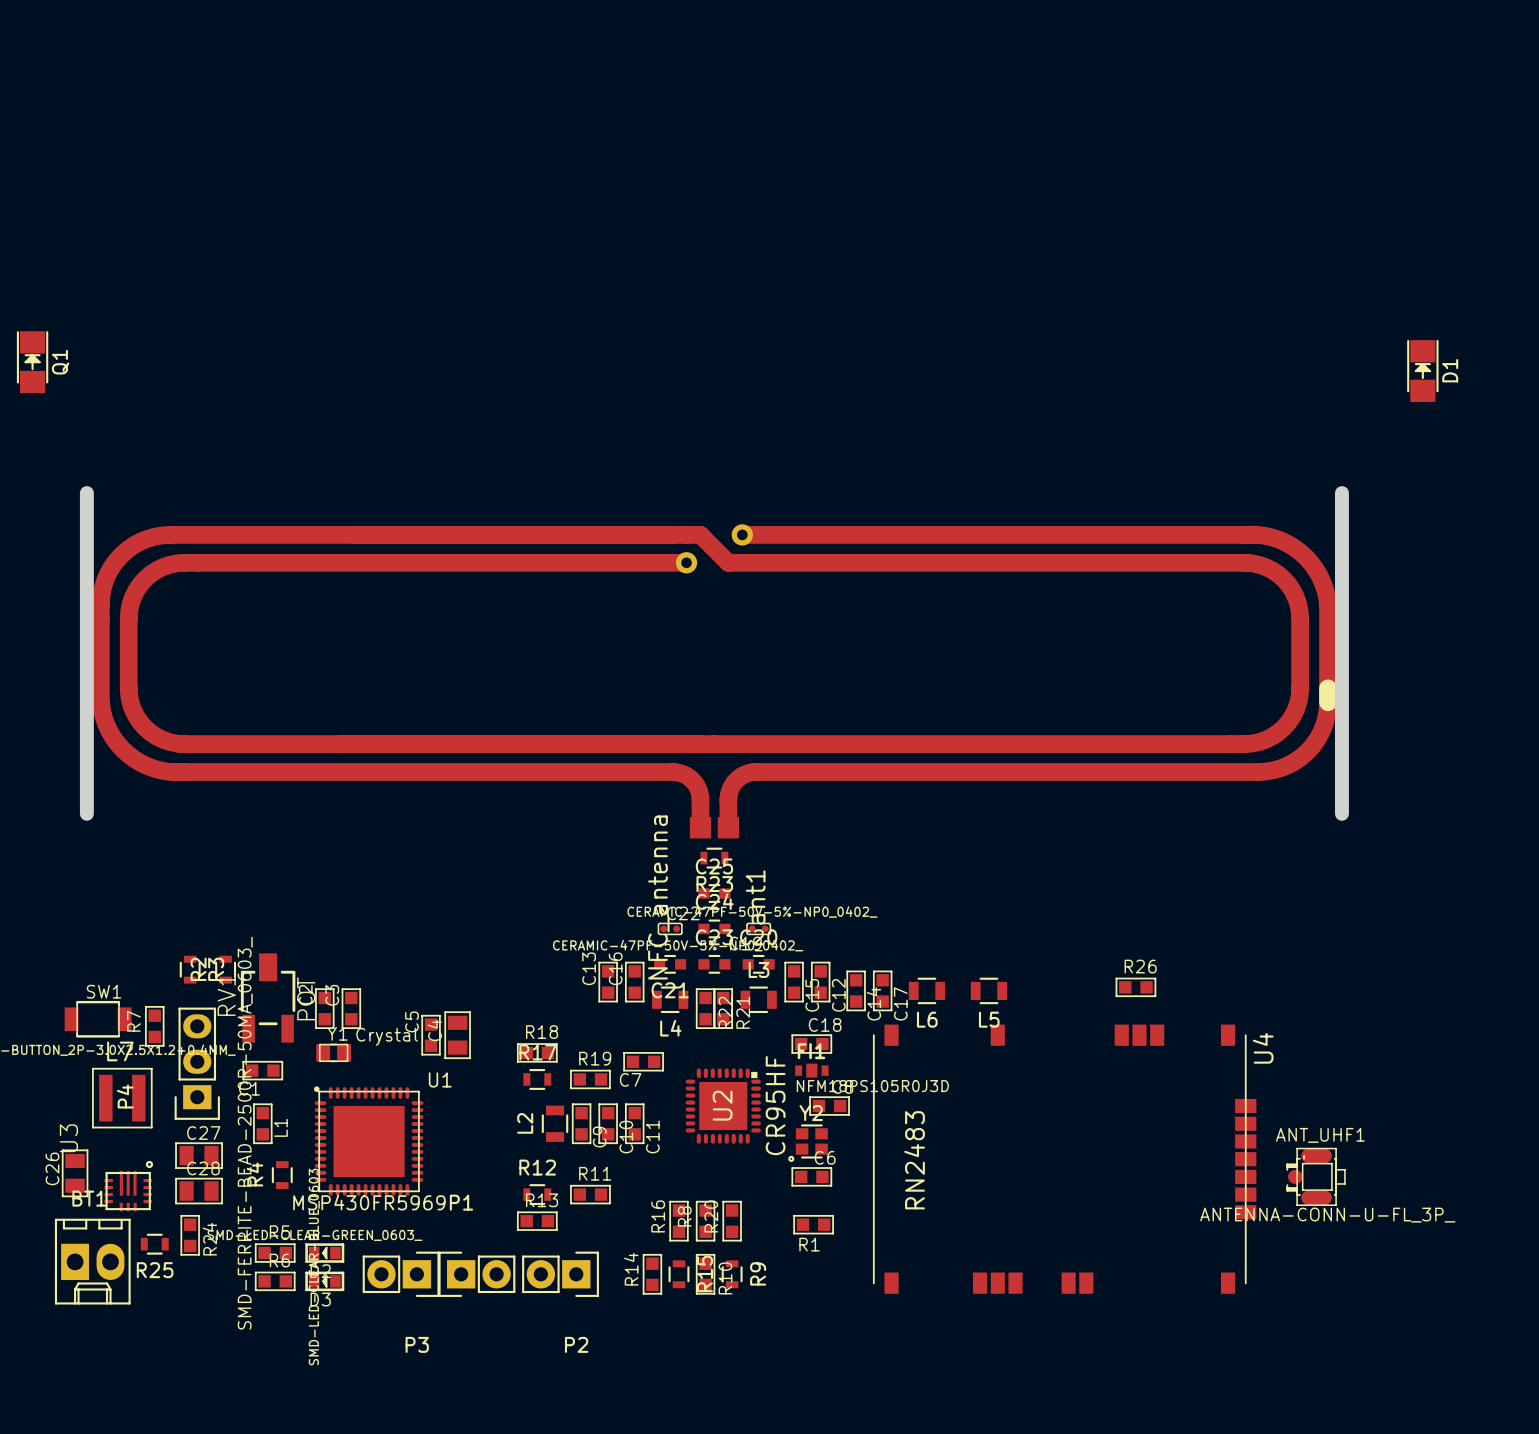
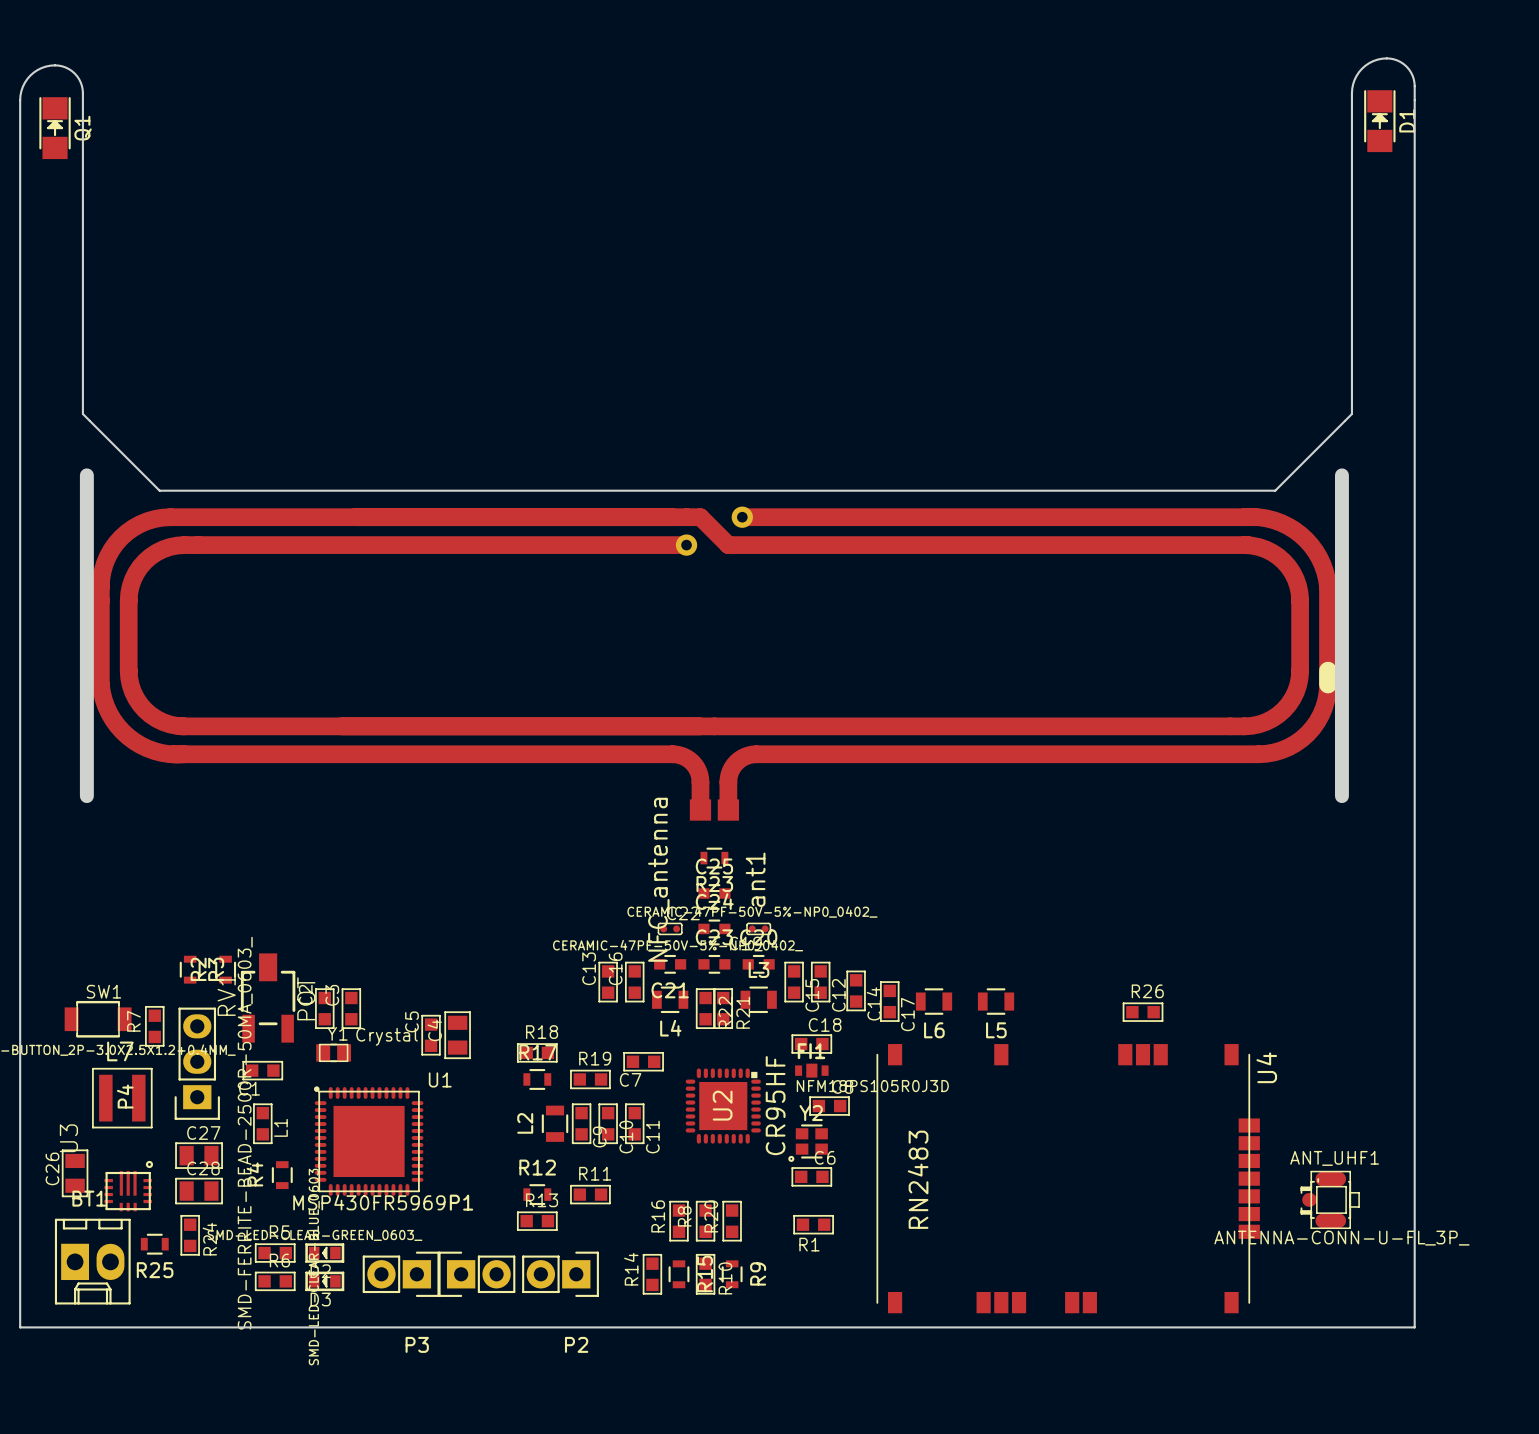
board edge: none -> (1386, 58) (1373, 61) (1362, 68) (1356, 75) (1352, 88) (1351, 414) (1275, 490) (159, 490) (82, 414) (82, 89) (74, 73) (62, 66) (46, 66) (30, 75) (22, 86) (20, 100) (20, 1327) (1414, 1327) (1414, 86) (1412, 75) (1406, 66) (1397, 60) (1386, 58)
Q1 position: (32, 362) -> (55, 128)
D1 position: (1422, 371) -> (1379, 121)
ant1 position: (714, 662) -> (714, 644)
R26 position: (1135, 987) -> (1143, 1012)
C17 position: (882, 990) -> (889, 1001)
L6 position: (926, 990) -> (934, 1001)
L5 position: (988, 990) -> (996, 1001)
U4 position: (1064, 1159) -> (1068, 1178)
ANT_UHF1 position: (1315, 1176) -> (1330, 1199)

